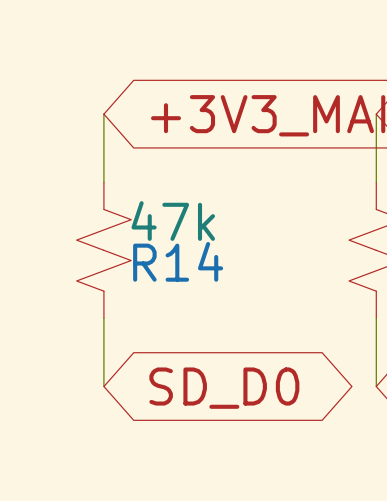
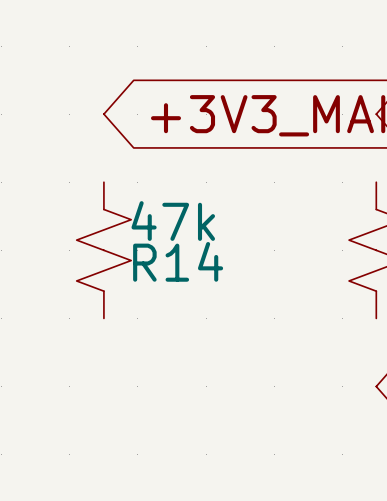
wire: (103, 114) (103, 182) -> none
wire: (376, 114) (376, 182) -> none
wire: (103, 318) (103, 386) -> none
wire: (376, 318) (376, 386) -> none
global label: SD_D0 (224, 388) -> none

